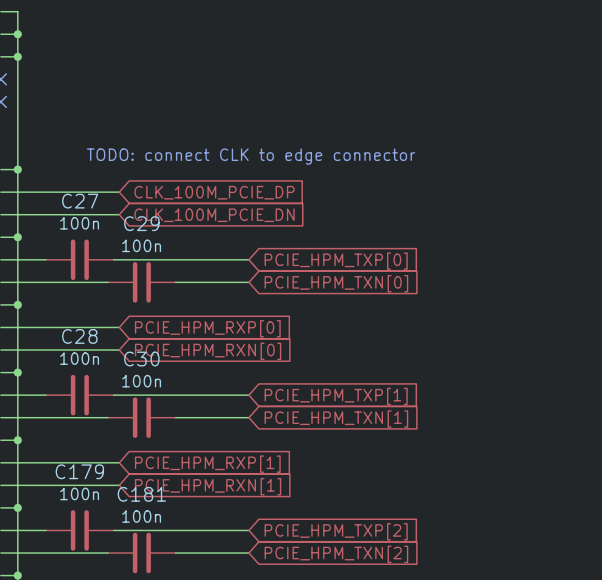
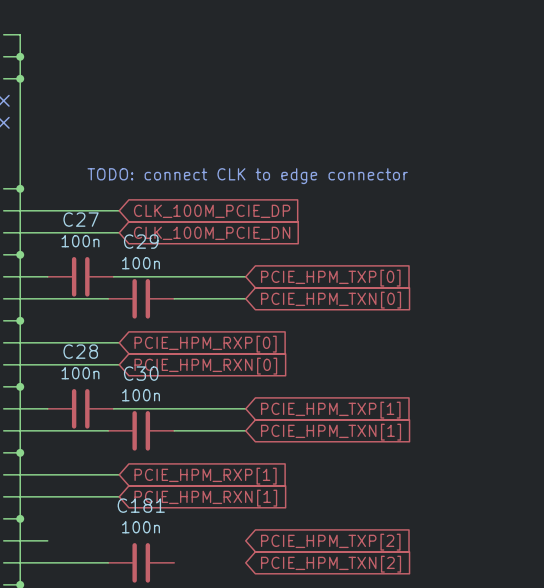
C179: (79, 530) -> none
wire: (113, 530) (249, 530) -> none
wire: (175, 553) (249, 553) -> none

